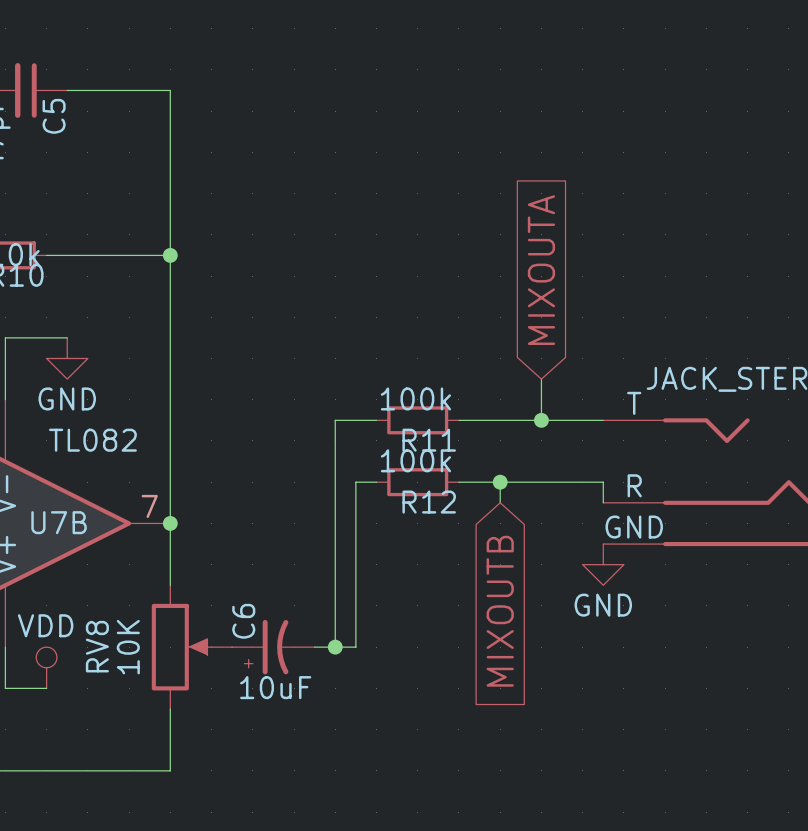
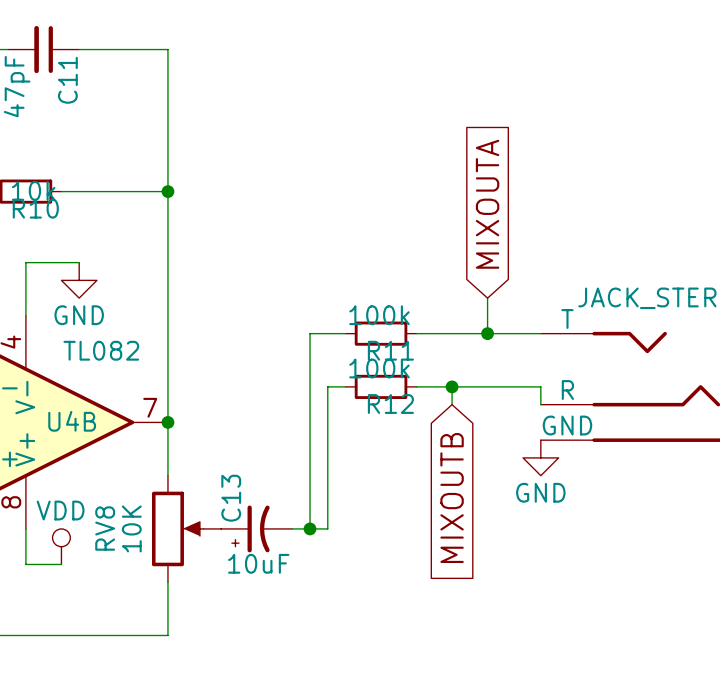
C5 name: C5 (54, 116) -> C11 (67, 80)
U7B name: U7B (59, 522) -> U4B (72, 421)
C6 name: C6 (243, 621) -> C13 (231, 498)

